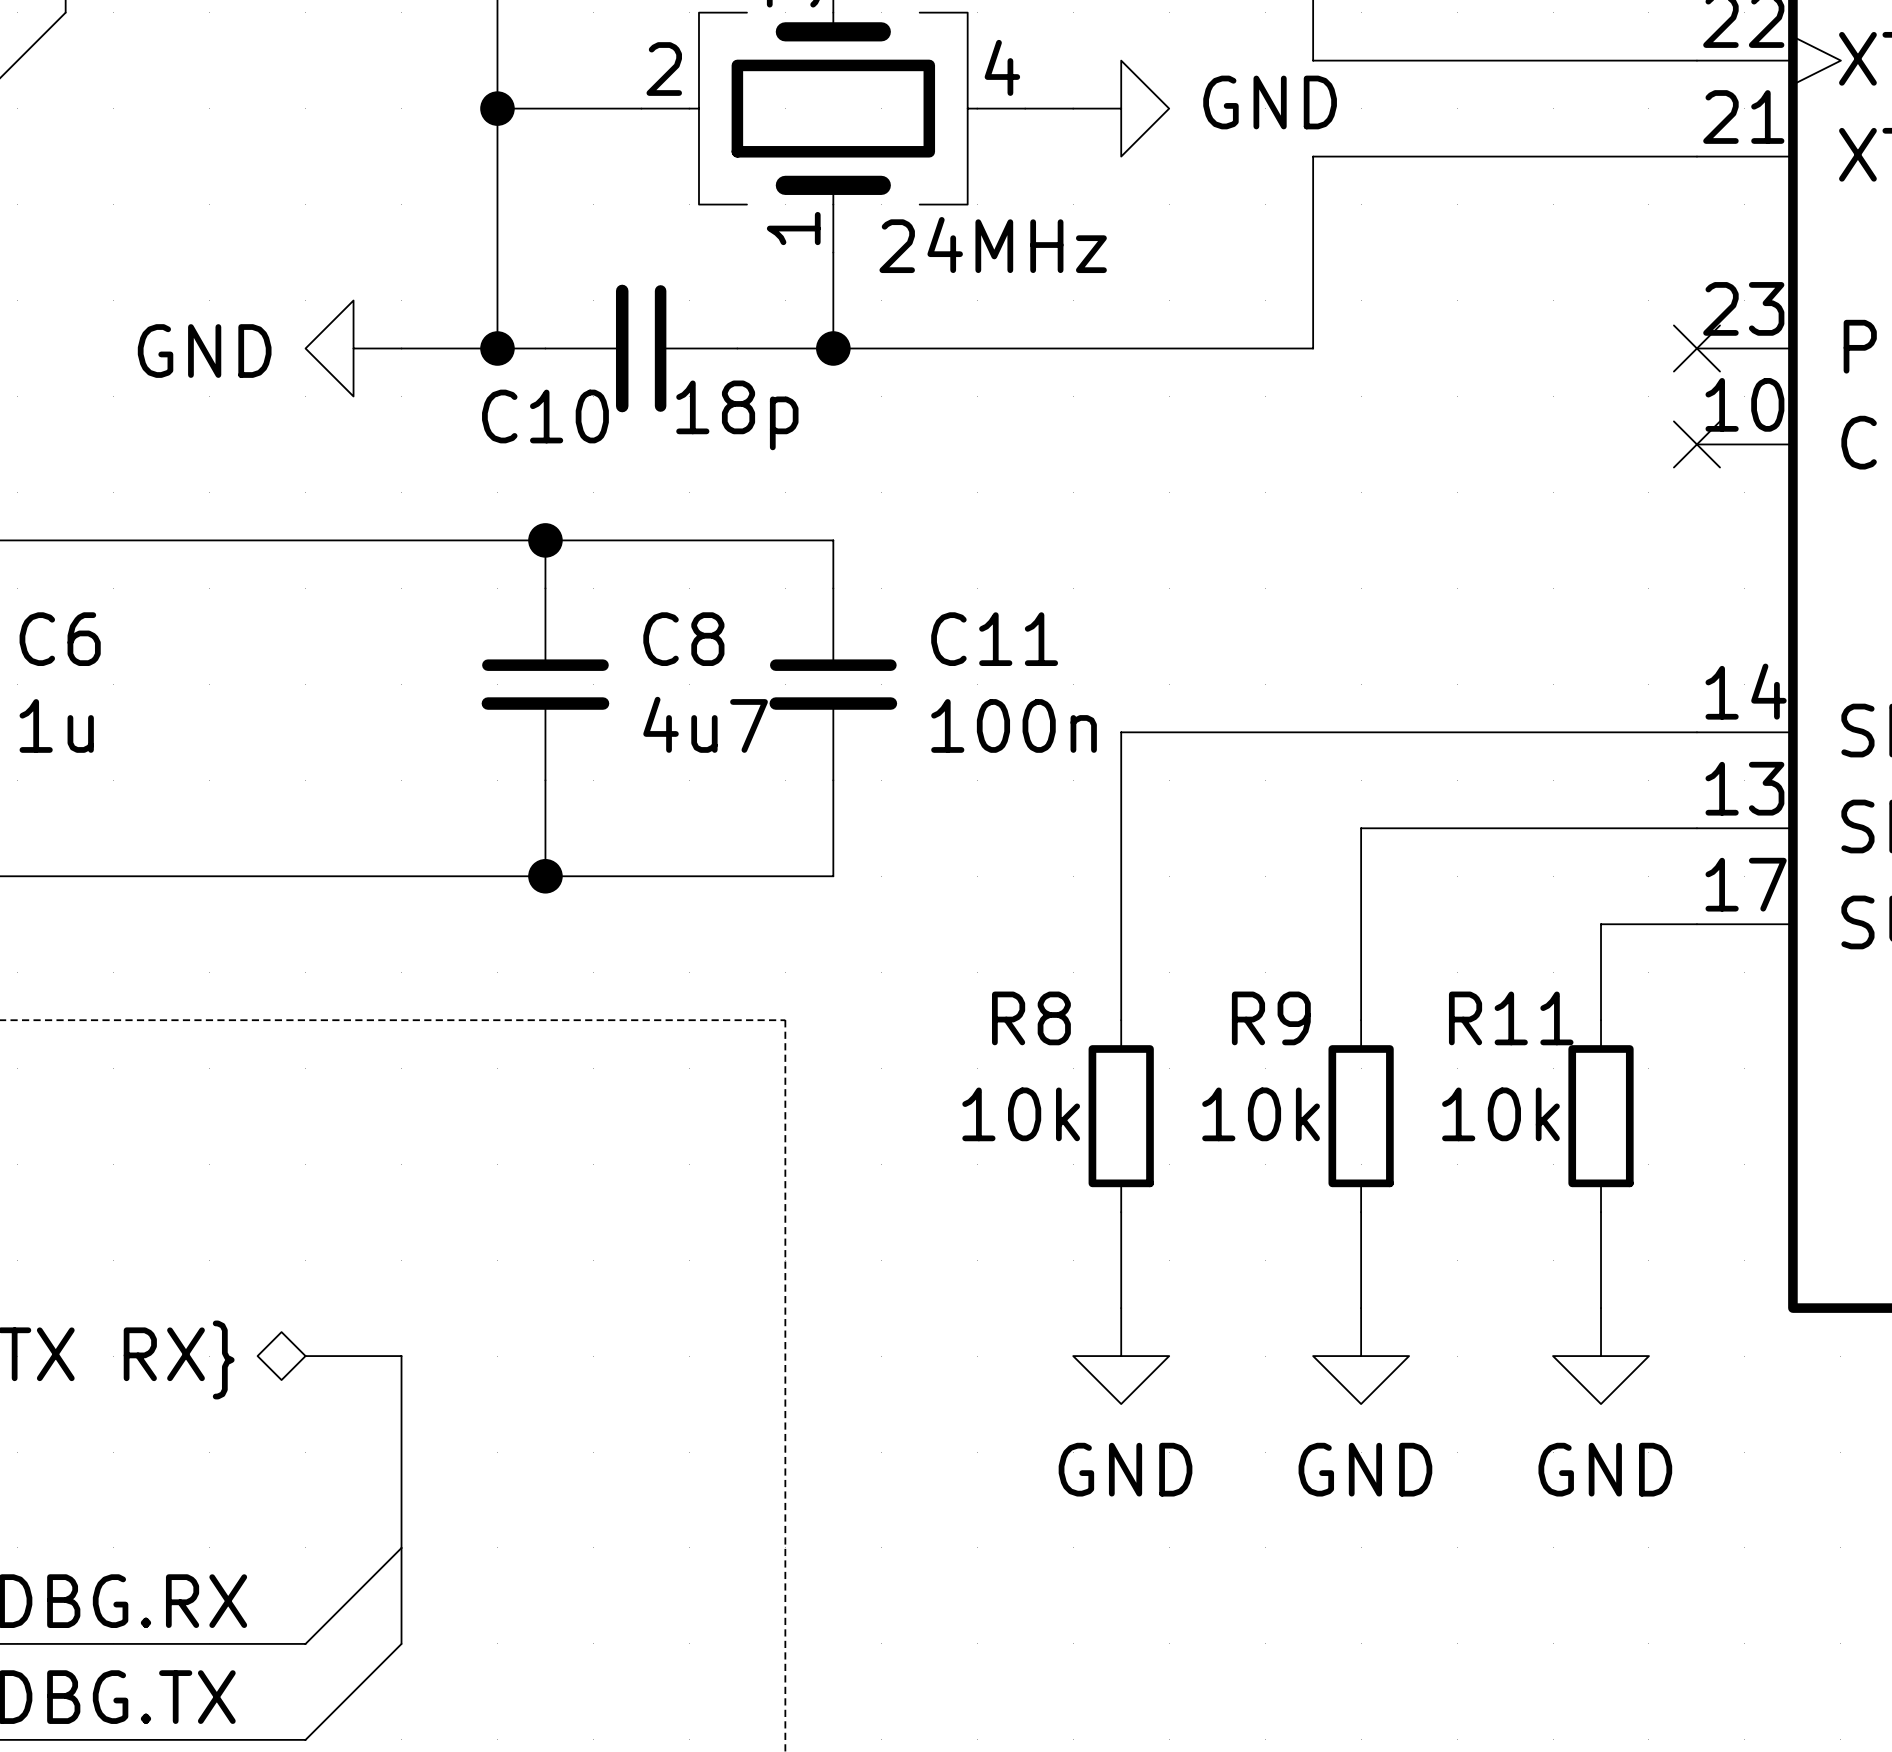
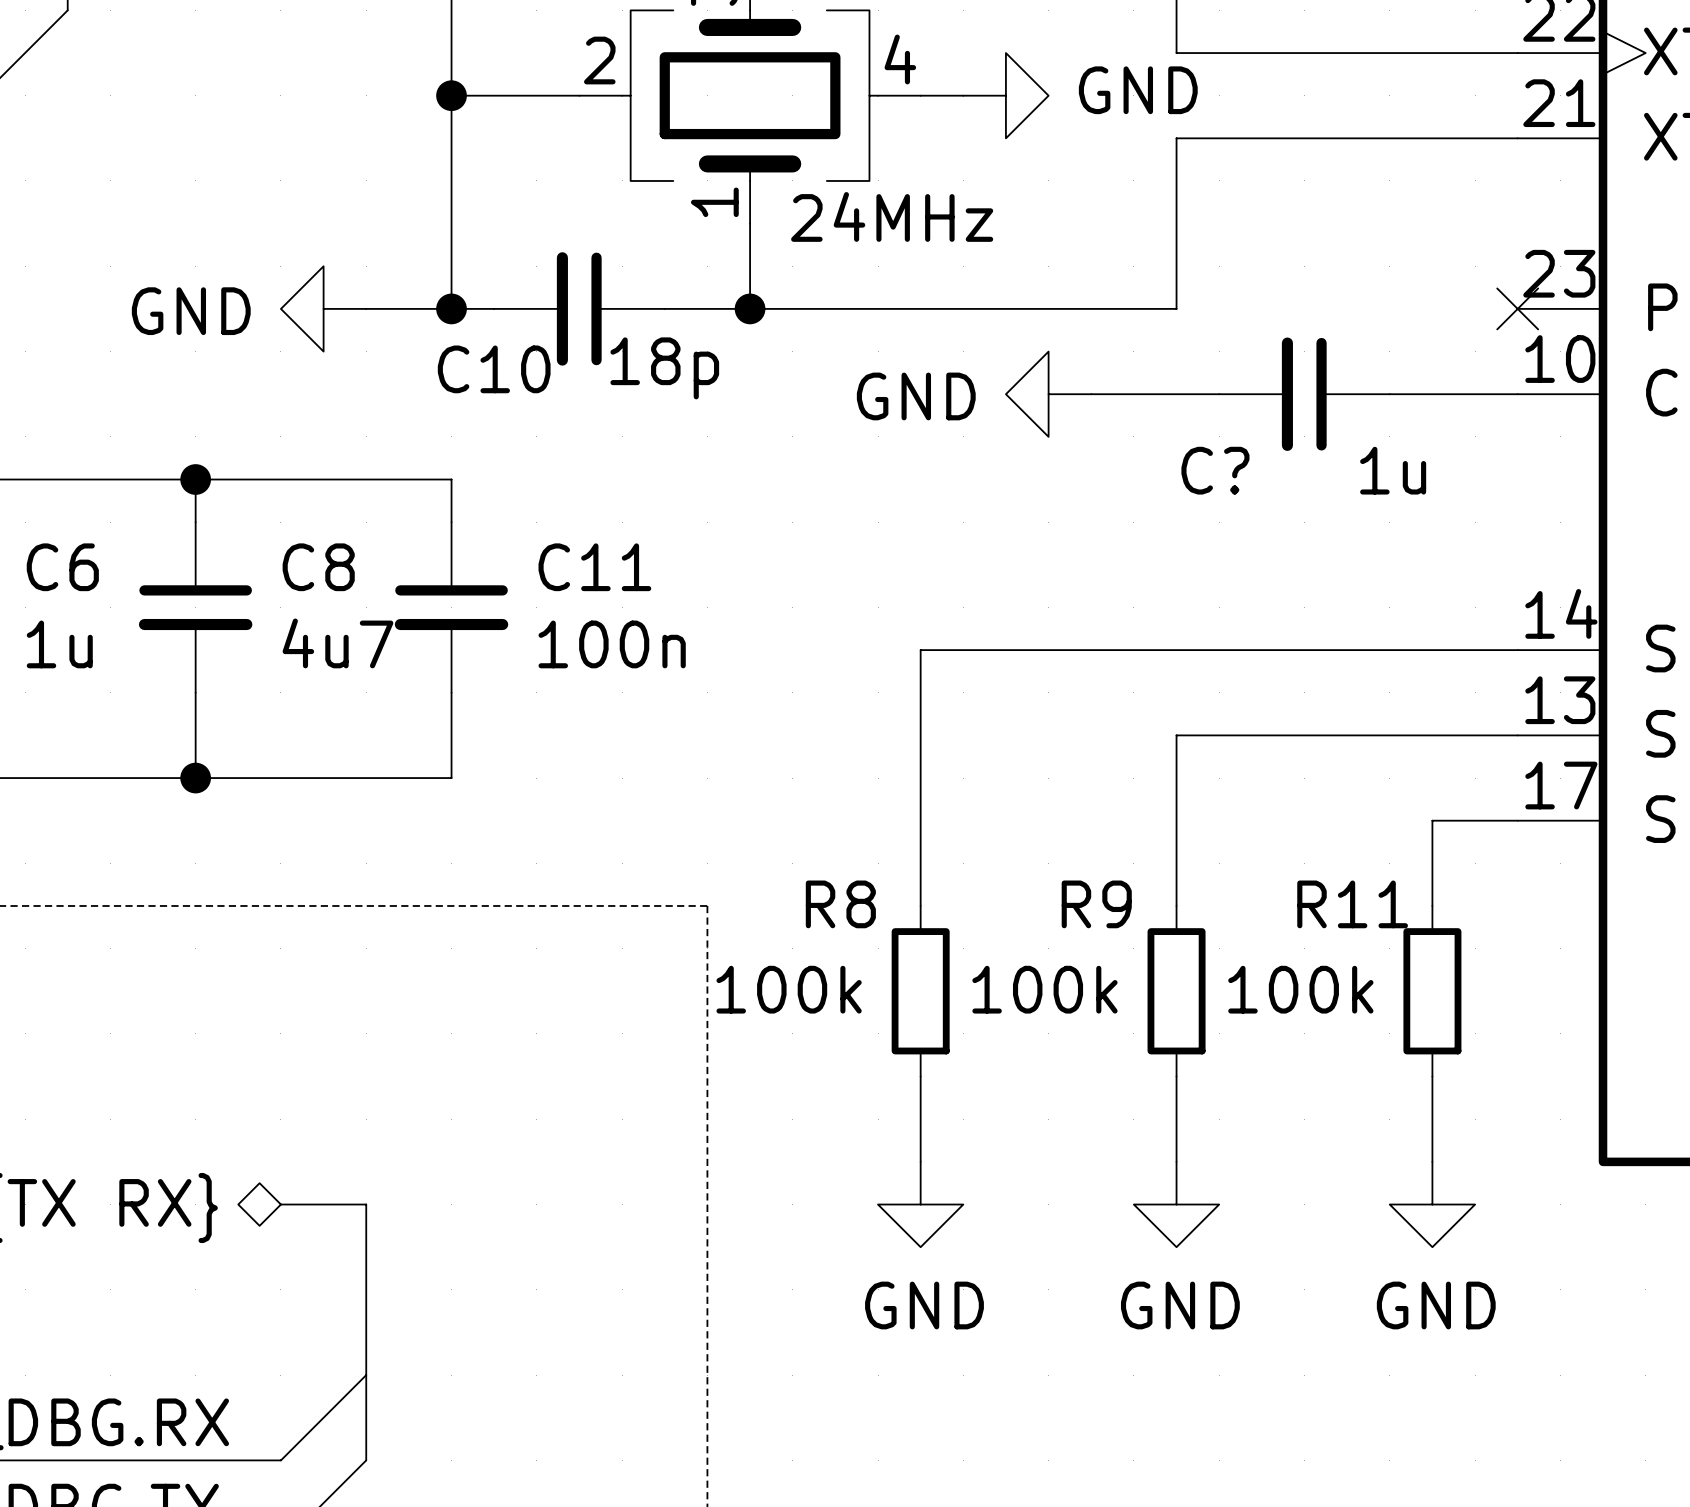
power symbol: none -> GND (1048, 394)
wire: none -> (1091, 394) (1219, 394)
C?: none -> 1u (1304, 394)
wire: none -> (1389, 394) (1517, 394)
no-connect mark: (1696, 444) -> none
junction: none -> (195, 479)
wire: (497, 540) (833, 540) (833, 588) -> (451, 479) (451, 522)
wire: (545, 540) (545, 588) -> (195, 479) (195, 522)
junction: (545, 540) -> none
C8 position: (545, 684) -> (195, 607)
C11 position: (833, 684) -> (451, 607)
wire: (1121, 732) (1121, 1020) -> (1005, 650) (920, 650) (920, 905)
wire: (545, 780) (545, 876) -> (195, 692) (195, 778)
wire: (833, 780) (833, 876) (497, 876) -> (451, 692) (451, 778)
wire: (1361, 828) (1361, 1020) -> (1219, 735) (1176, 735) (1176, 905)
junction: none -> (195, 778)
junction: (545, 876) -> none
R8 value: 10k (1021, 1114) -> 100k (789, 989)
R9 value: 10k (1261, 1114) -> 100k (1044, 989)
R11 value: 10k (1500, 1114) -> 100k (1300, 989)
R8 position: (1121, 1116) -> (920, 991)
R9 position: (1361, 1116) -> (1176, 991)
wire: (1121, 1212) (1121, 1308) -> (920, 1076) (920, 1161)
wire: (1361, 1212) (1361, 1308) -> (1176, 1076) (1176, 1161)
power symbol: none -> GND (920, 1204)
power symbol: GND (1121, 1356) -> none
power symbol position: GND (1361, 1356) -> GND (1176, 1204)

